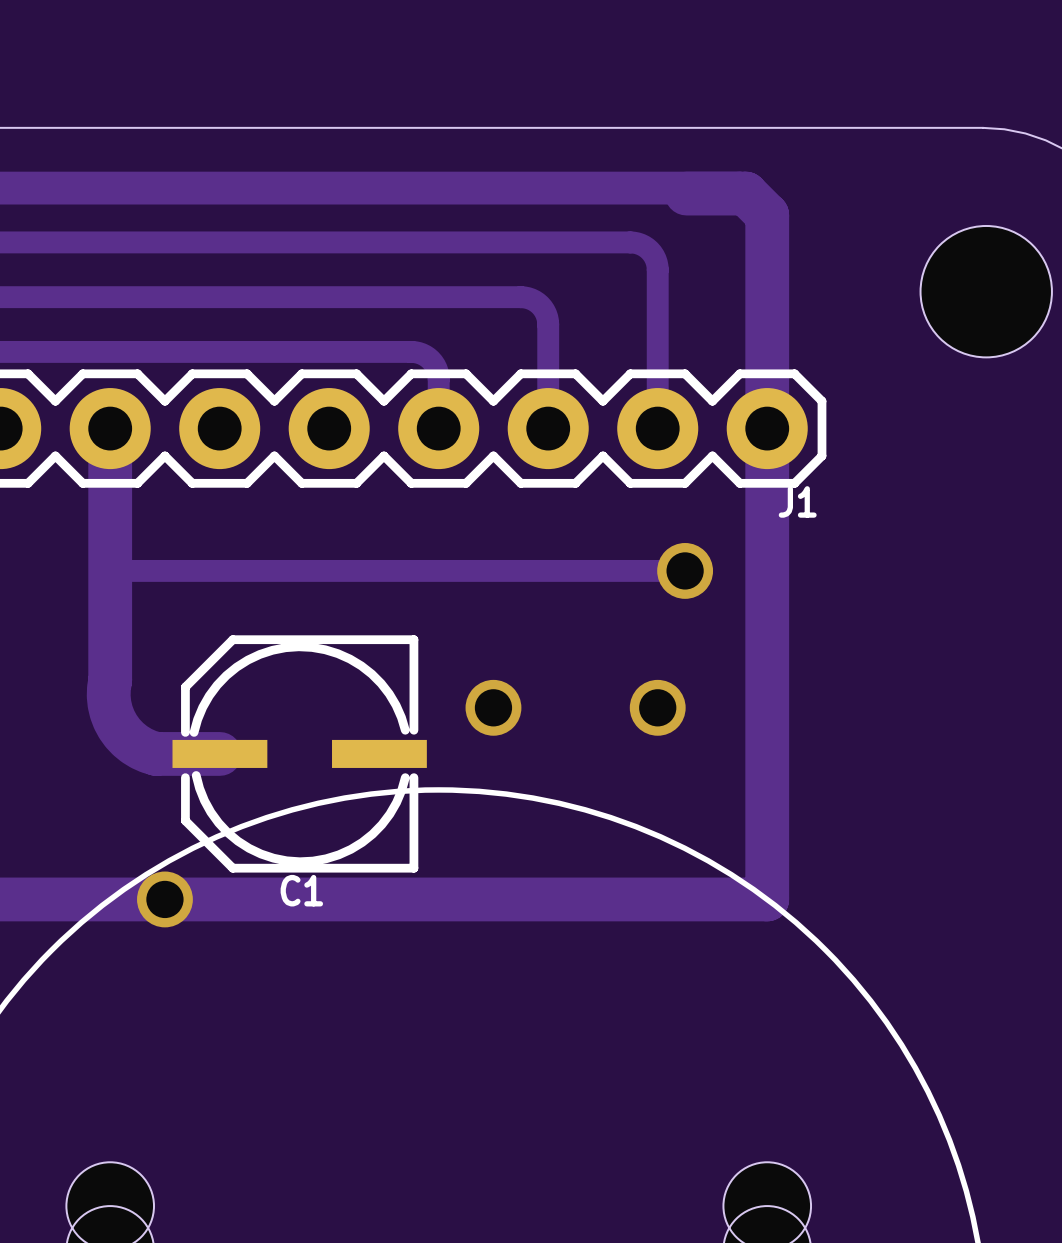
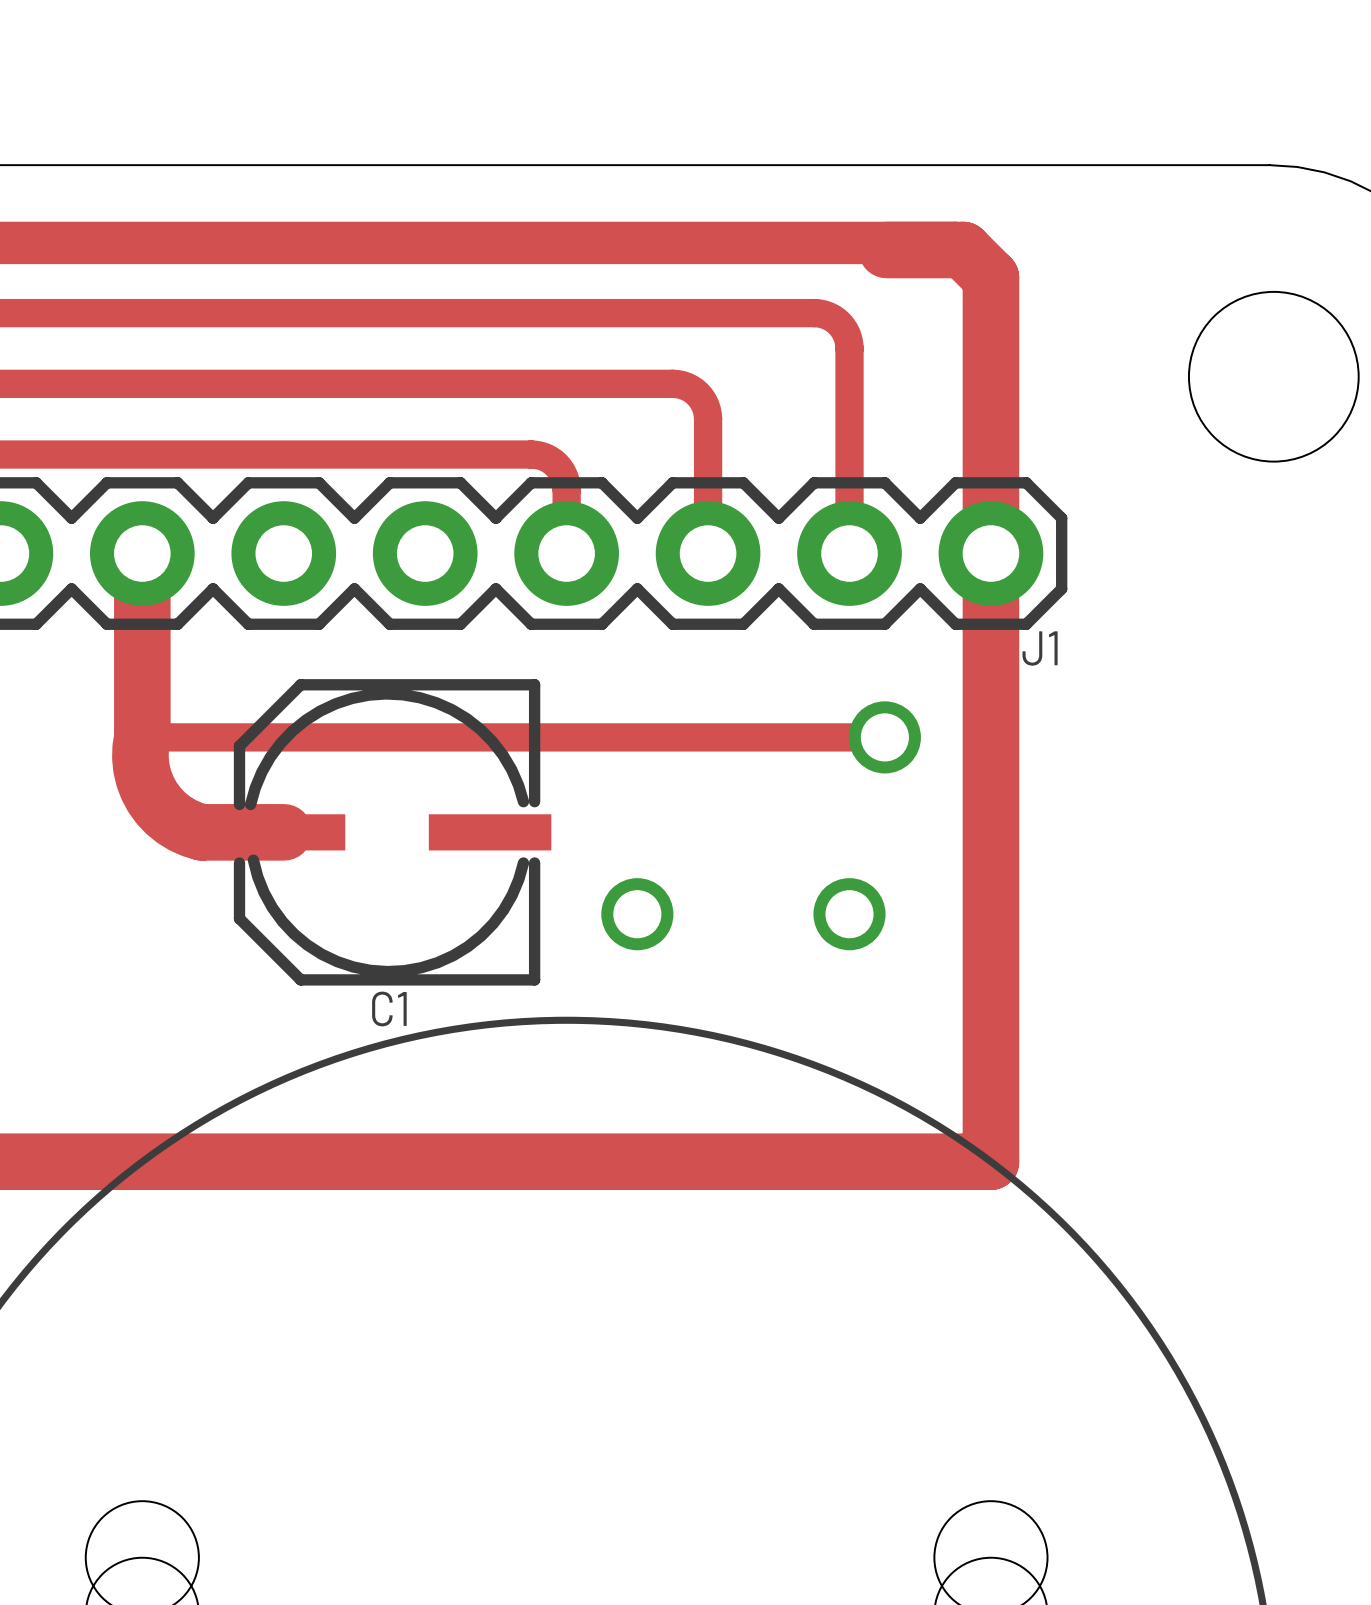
track: (110, 434) (108, 696) (111, 712) (122, 733) (134, 744) (148, 751) (156, 753) (219, 753) -> none
track: none -> (142, 737) (140, 758) (147, 788) (158, 805) (173, 819) (201, 832) (284, 832)
C1 position: (299, 753) -> (387, 832)
via: (164, 899) -> none

